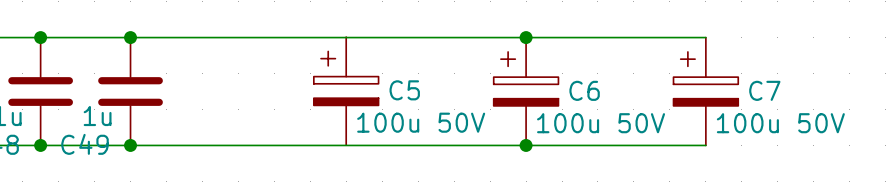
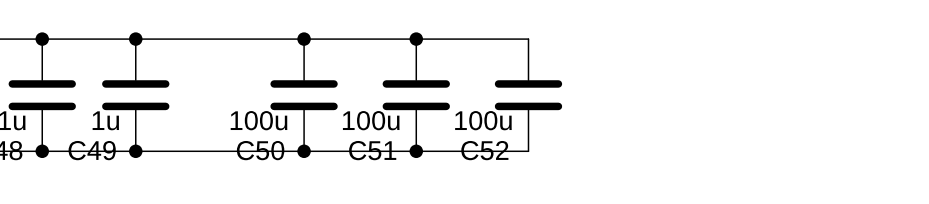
junction: none -> (304, 39)
junction: none -> (416, 39)
wire: (508, 37) (705, 37) -> none
junction: (526, 37) -> none
C50: none -> 100u (304, 95)
C5: 100u 50V (346, 91) -> none
C51: none -> 100u (416, 95)
C52: none -> 100u (528, 95)
C6: 100u 50V (526, 91) -> none
C7: 100u 50V (705, 91) -> none
junction: none -> (304, 151)
junction: none -> (416, 151)
wire: (508, 145) (705, 145) -> none
junction: (526, 145) -> none

